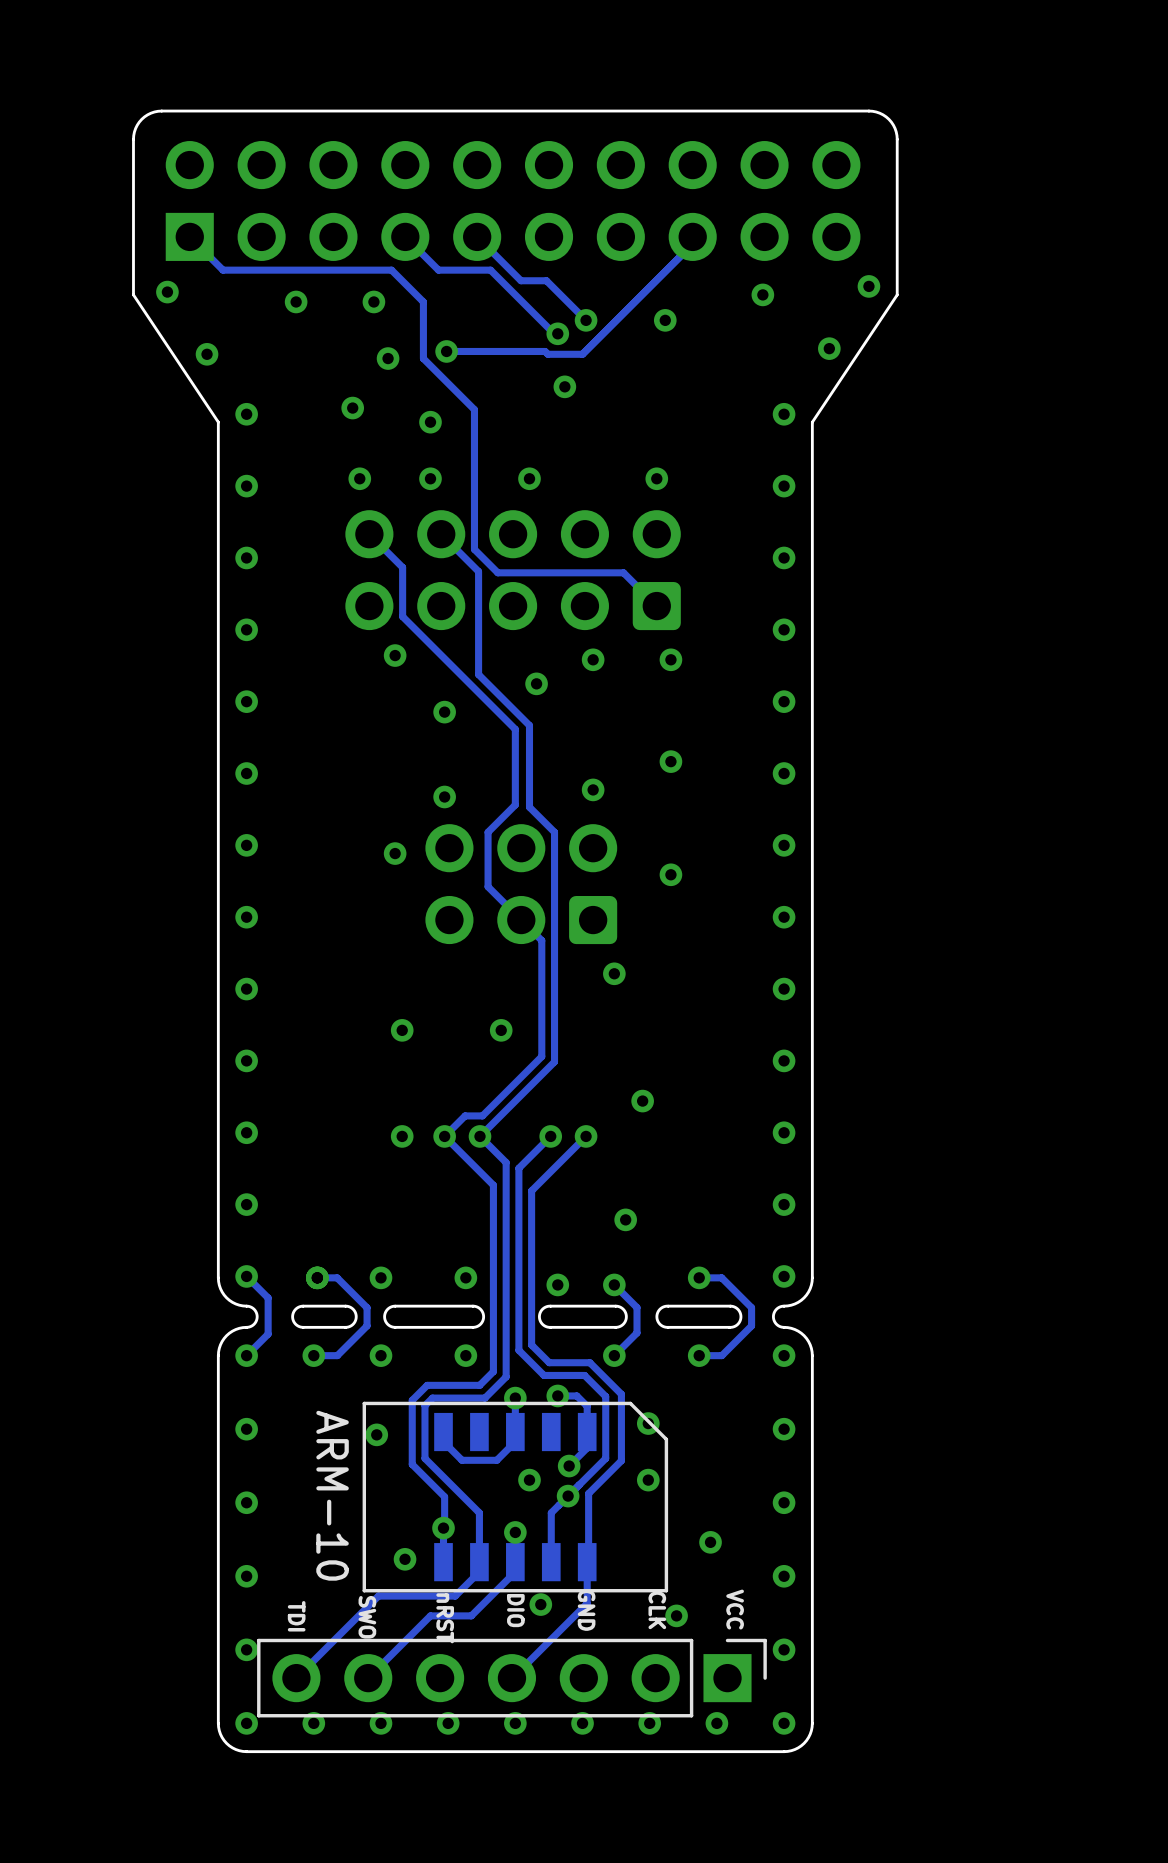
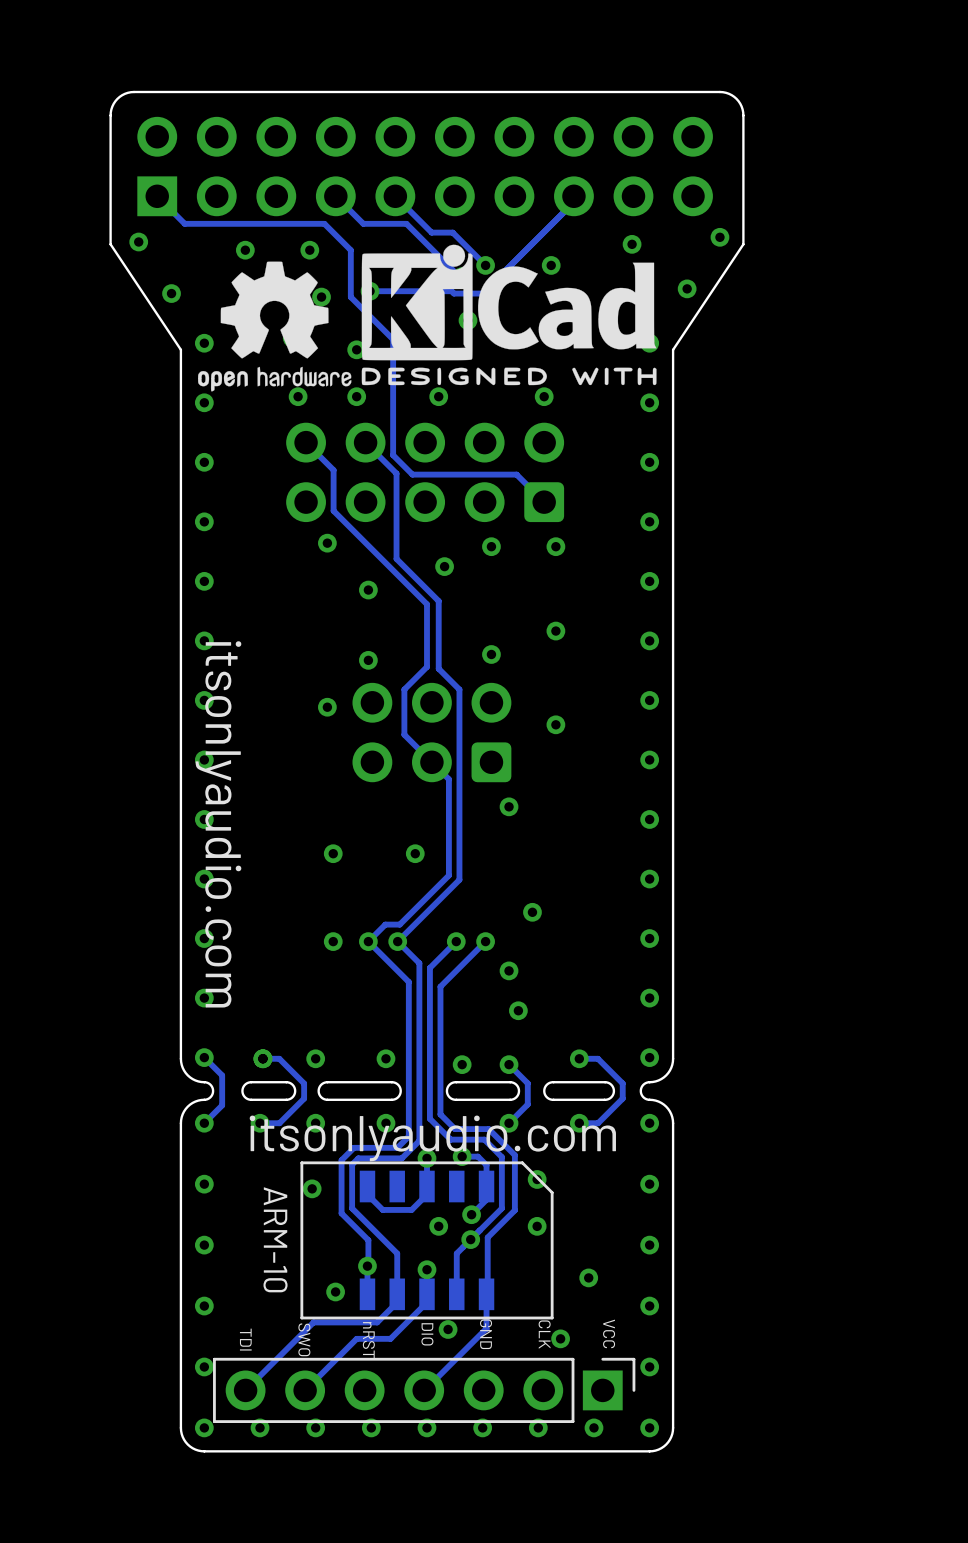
drawing: none -> [198, 244, 657, 392]
text: none -> itsonlyaudio.com (218, 824)
via: none -> (509, 970)
text: none -> itsonlyaudio.com (432, 1138)

